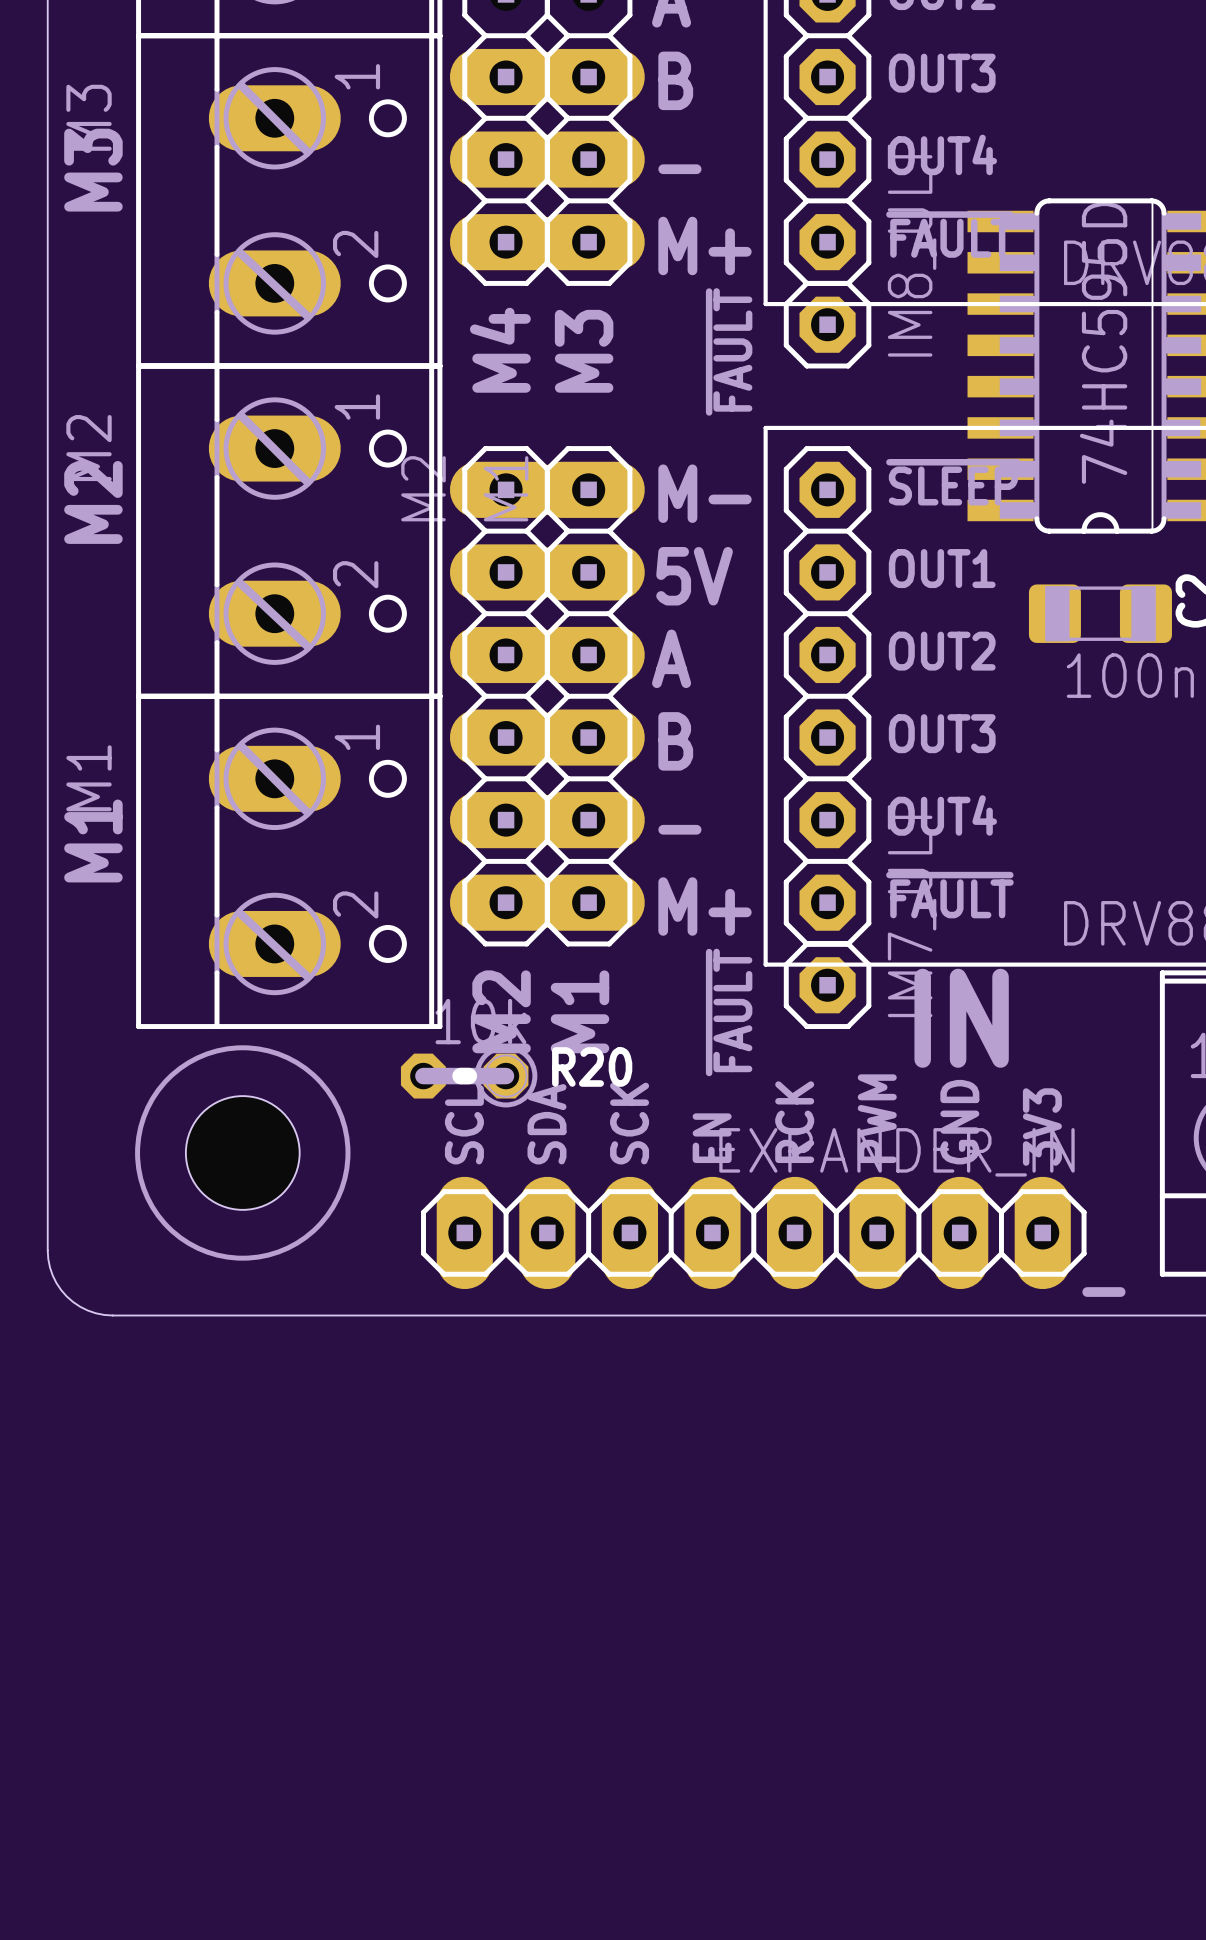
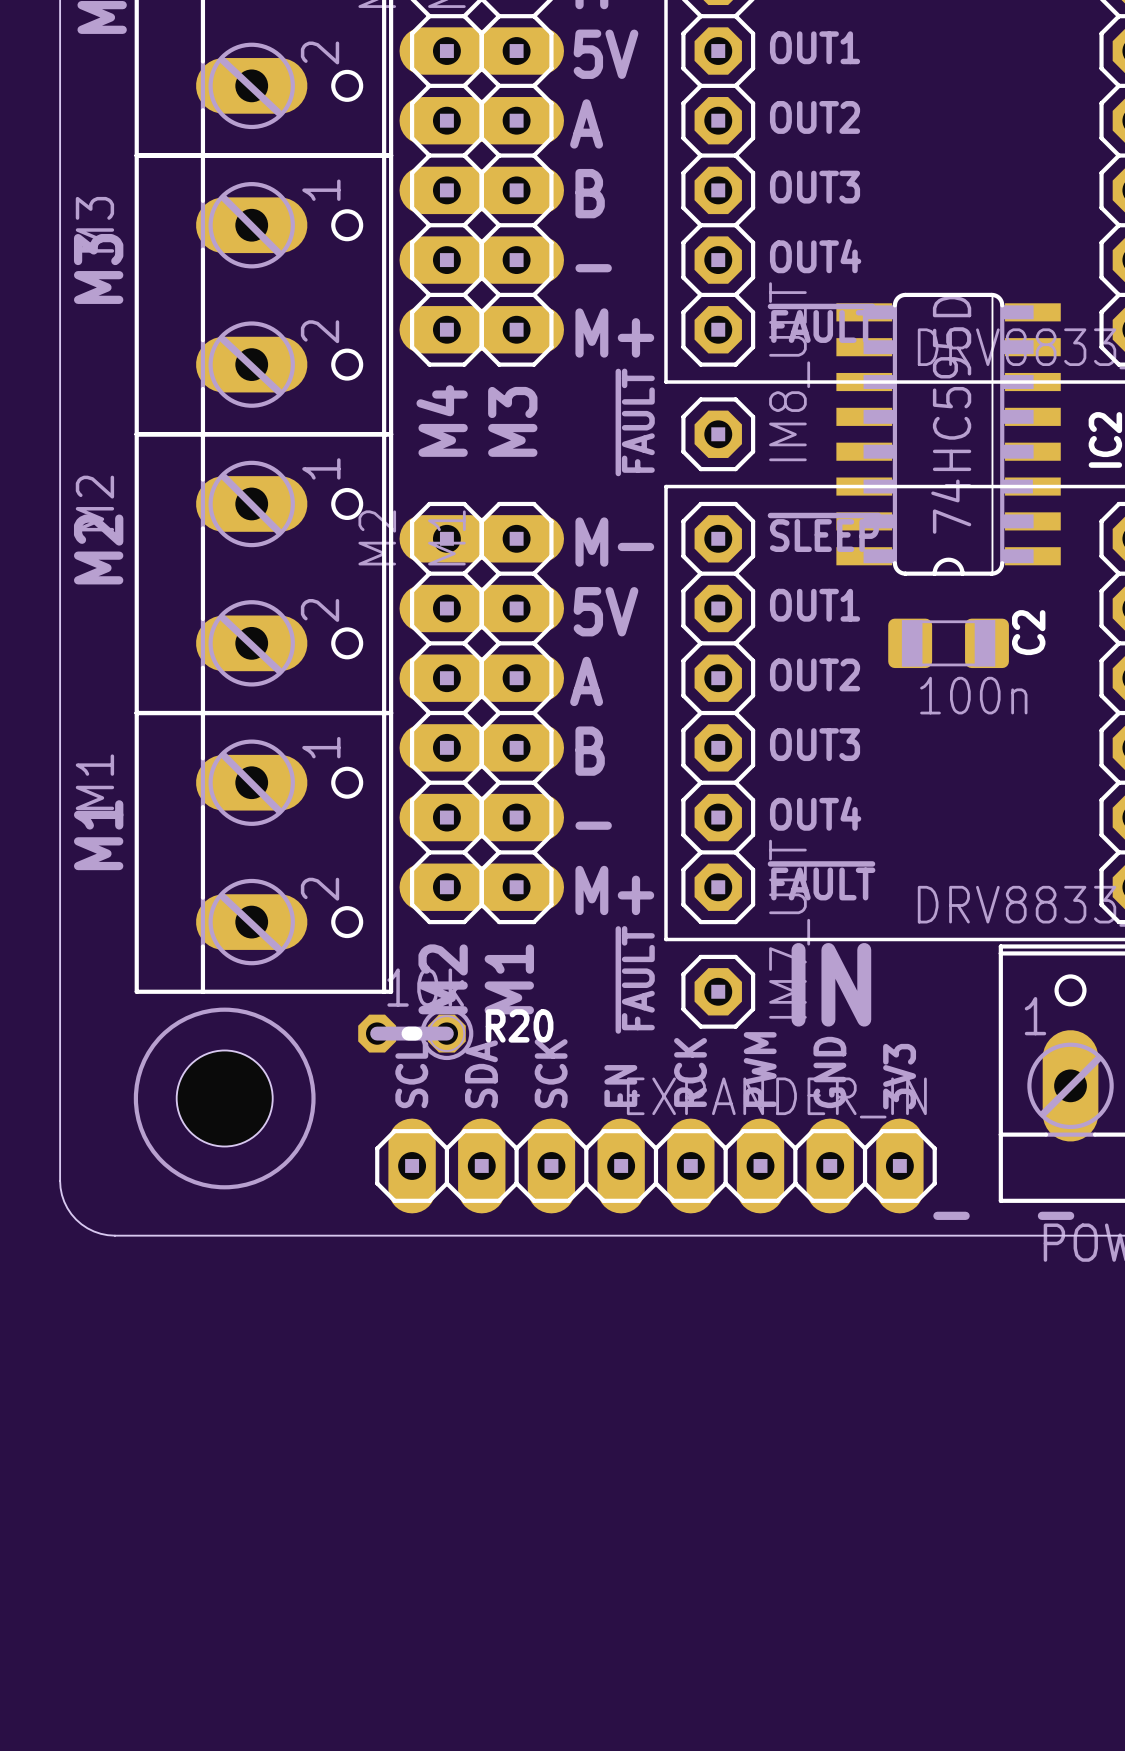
part position: (827, 324) -> (718, 434)
part position: (827, 985) -> (718, 991)

